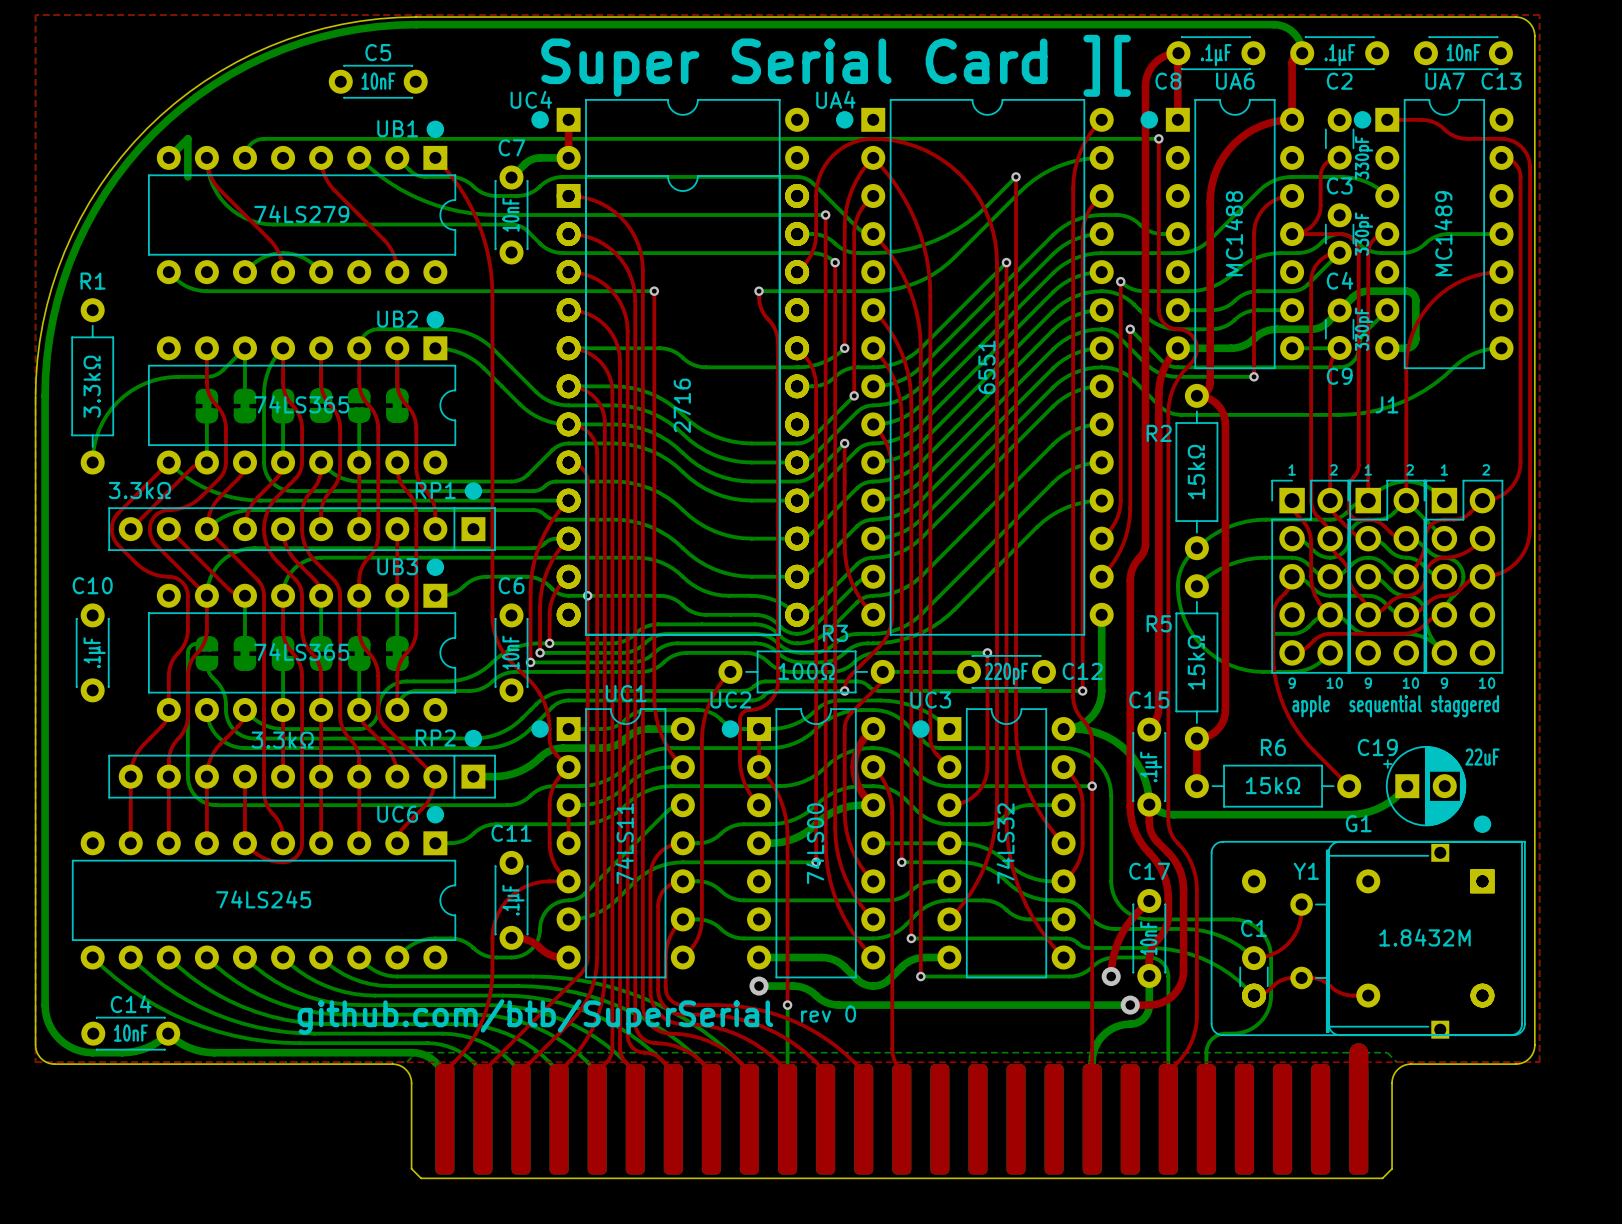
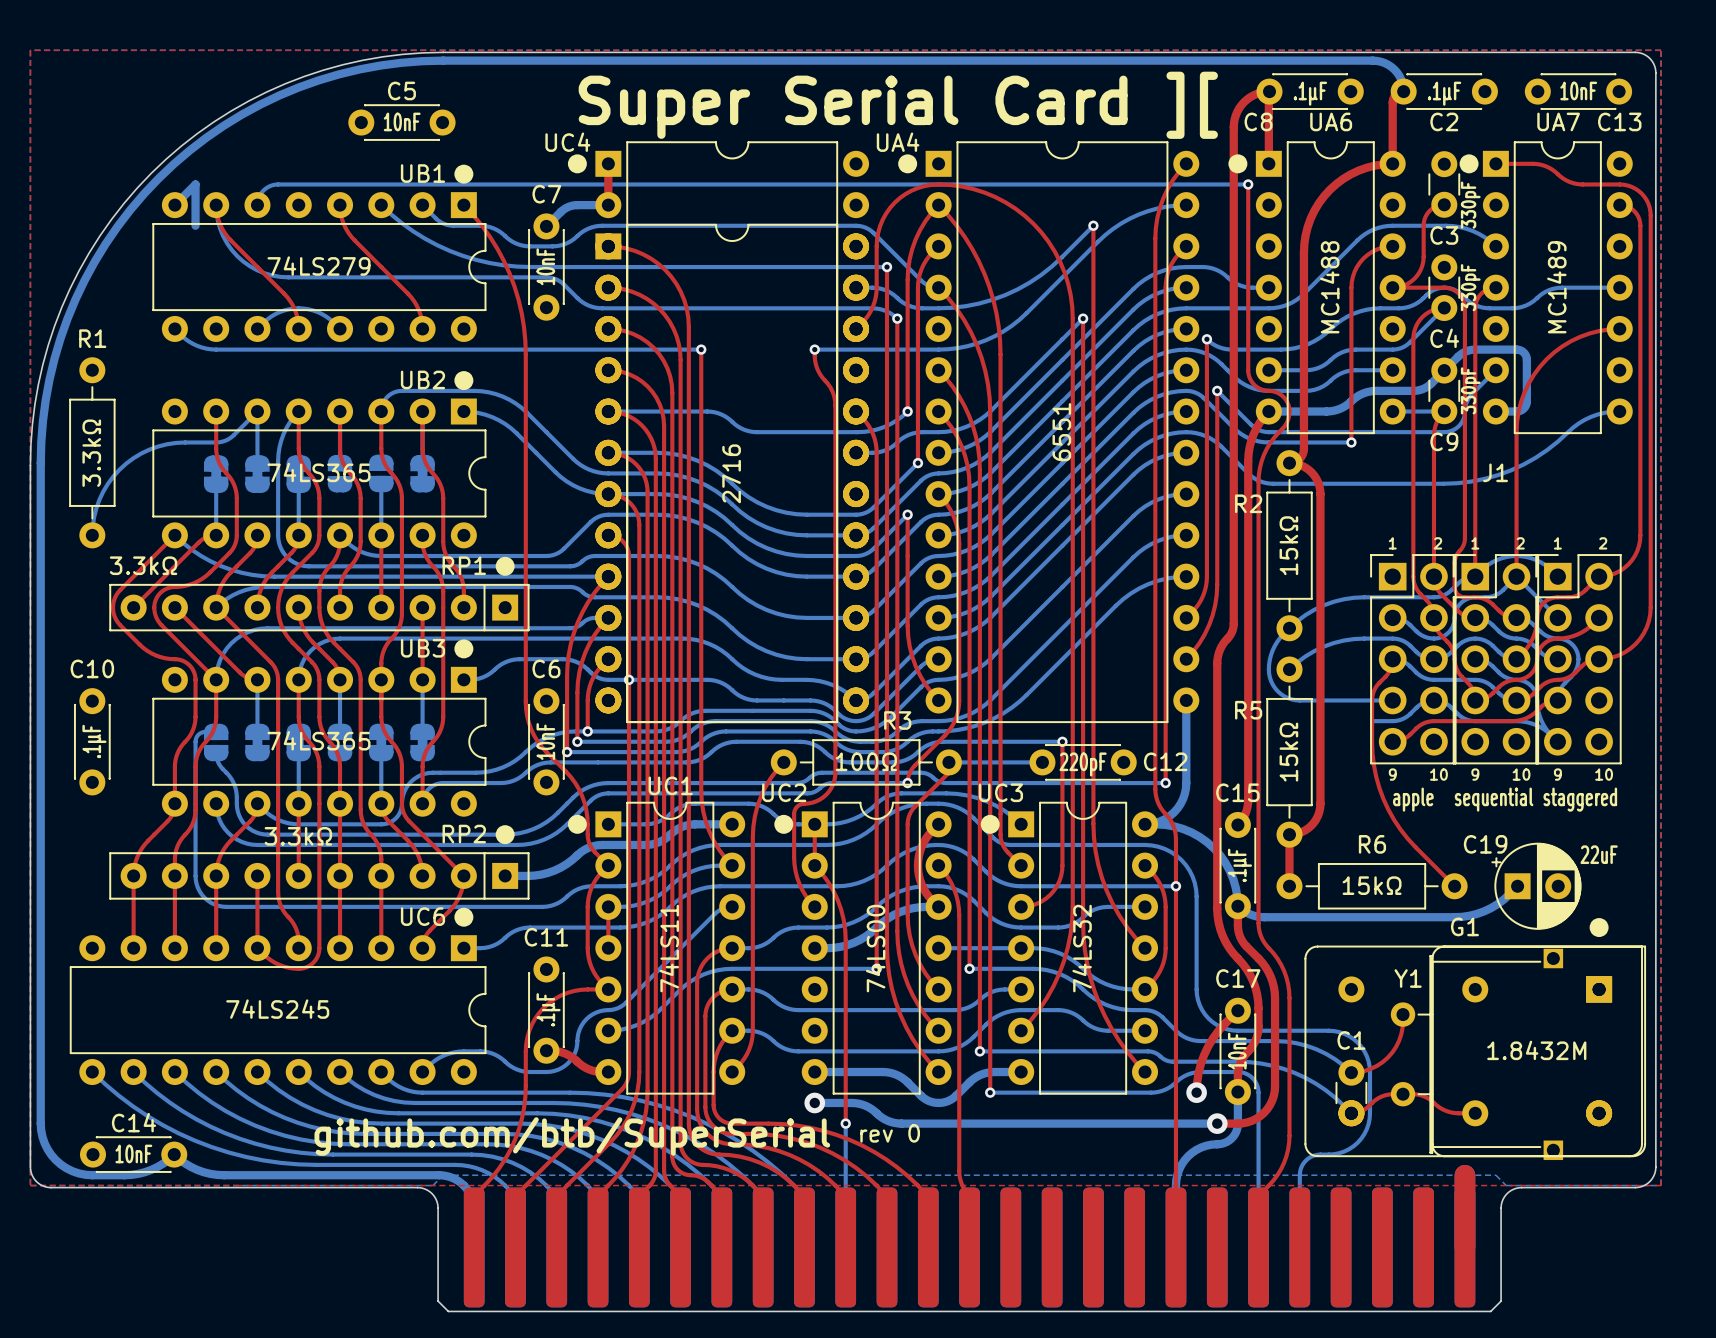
top track: (1292, 500) (1295, 512) (1305, 524) (1310, 536) (1313, 590) (1318, 602) (1330, 614) -> none
bottom track: (1177, 586) (1181, 611) (1192, 633) (1209, 652) (1230, 665) (1255, 671) (1296, 671) (1313, 666) (1330, 652) -> (1268, 669) (1271, 681) (1275, 688) (1280, 694) (1291, 699) (1392, 700)

